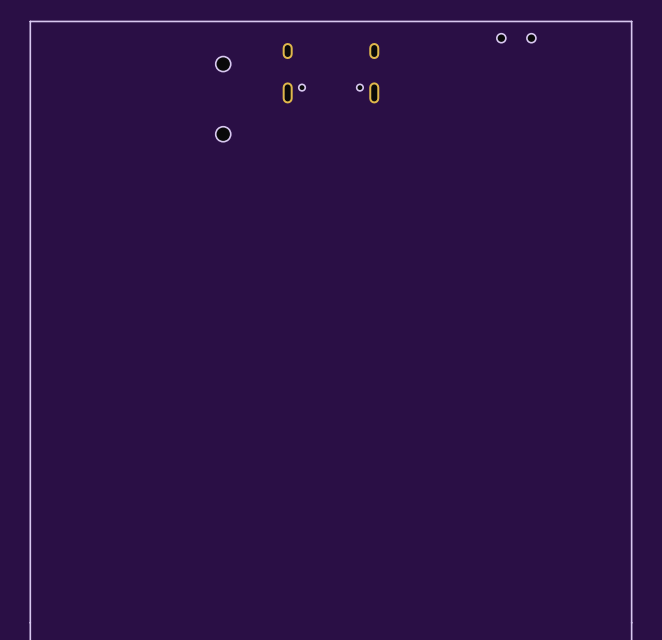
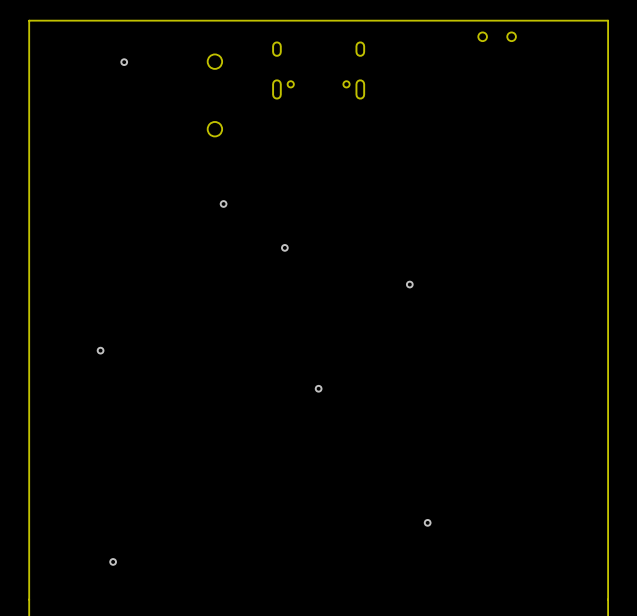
via: none -> (124, 62)
via: none -> (223, 203)
via: none -> (284, 247)
via: none -> (409, 284)
via: none -> (100, 350)
via: none -> (318, 388)
via: none -> (427, 522)
via: none -> (113, 561)

